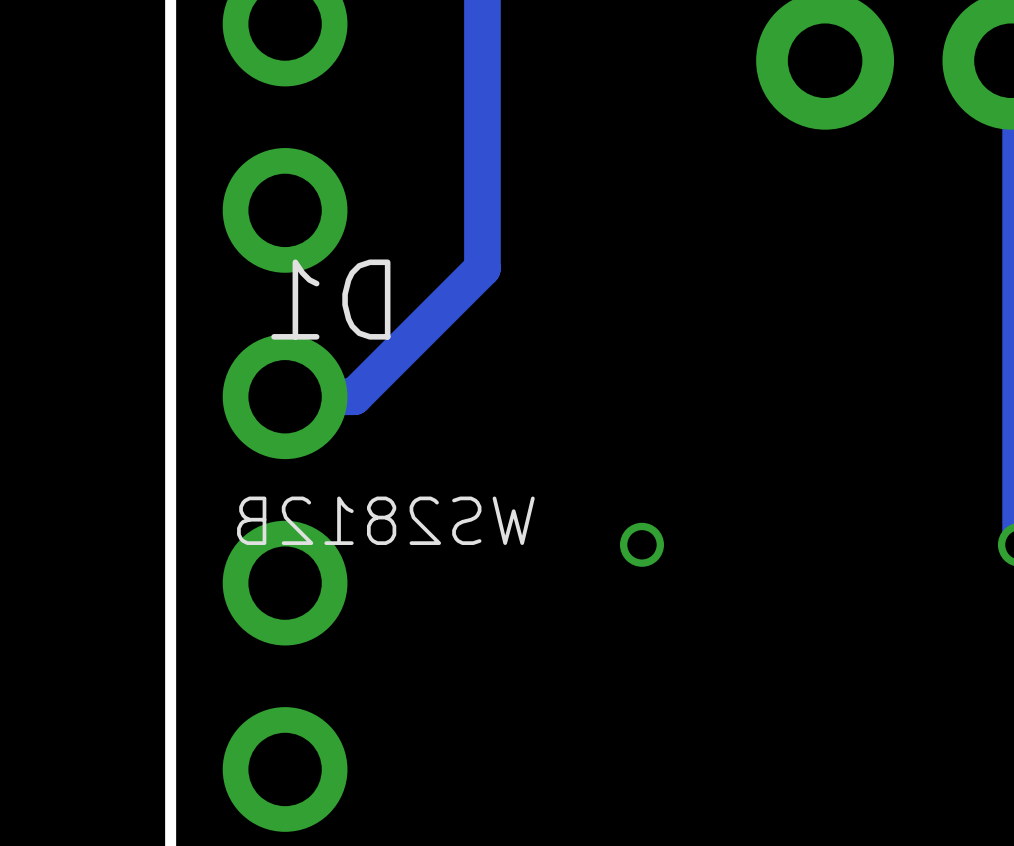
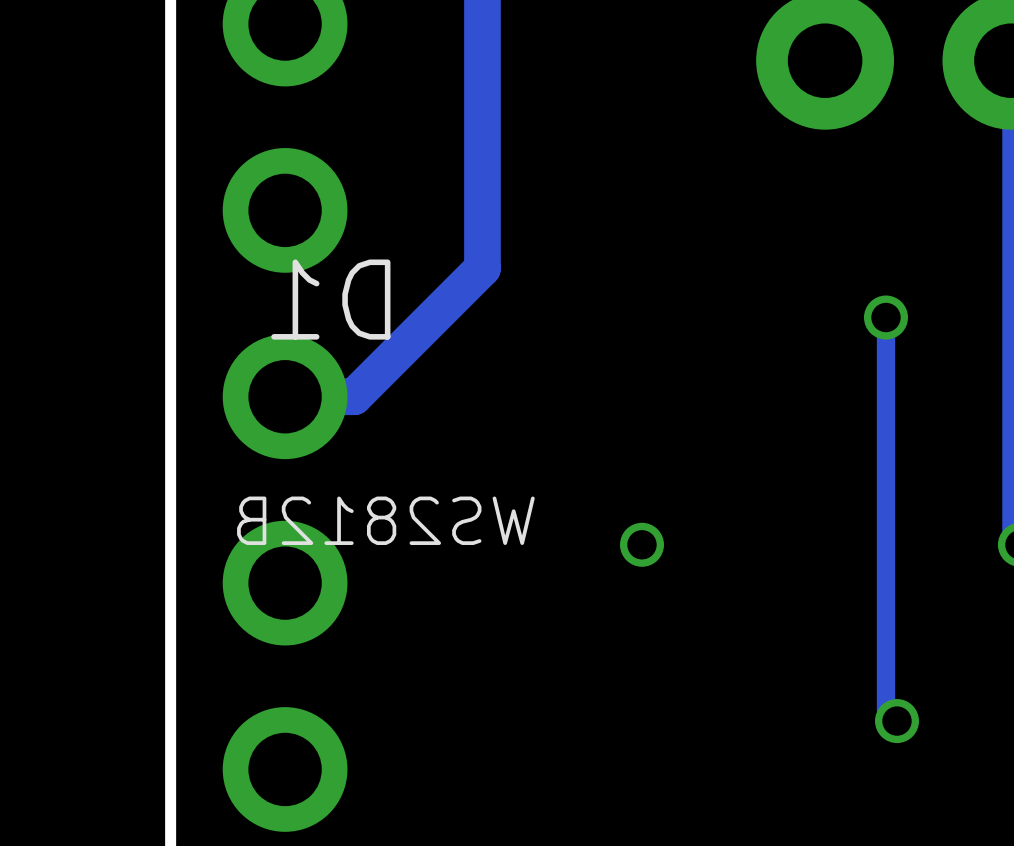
track: none -> (885, 317) (885, 710) (896, 721)
via: none -> (885, 317)
via: none -> (896, 721)

